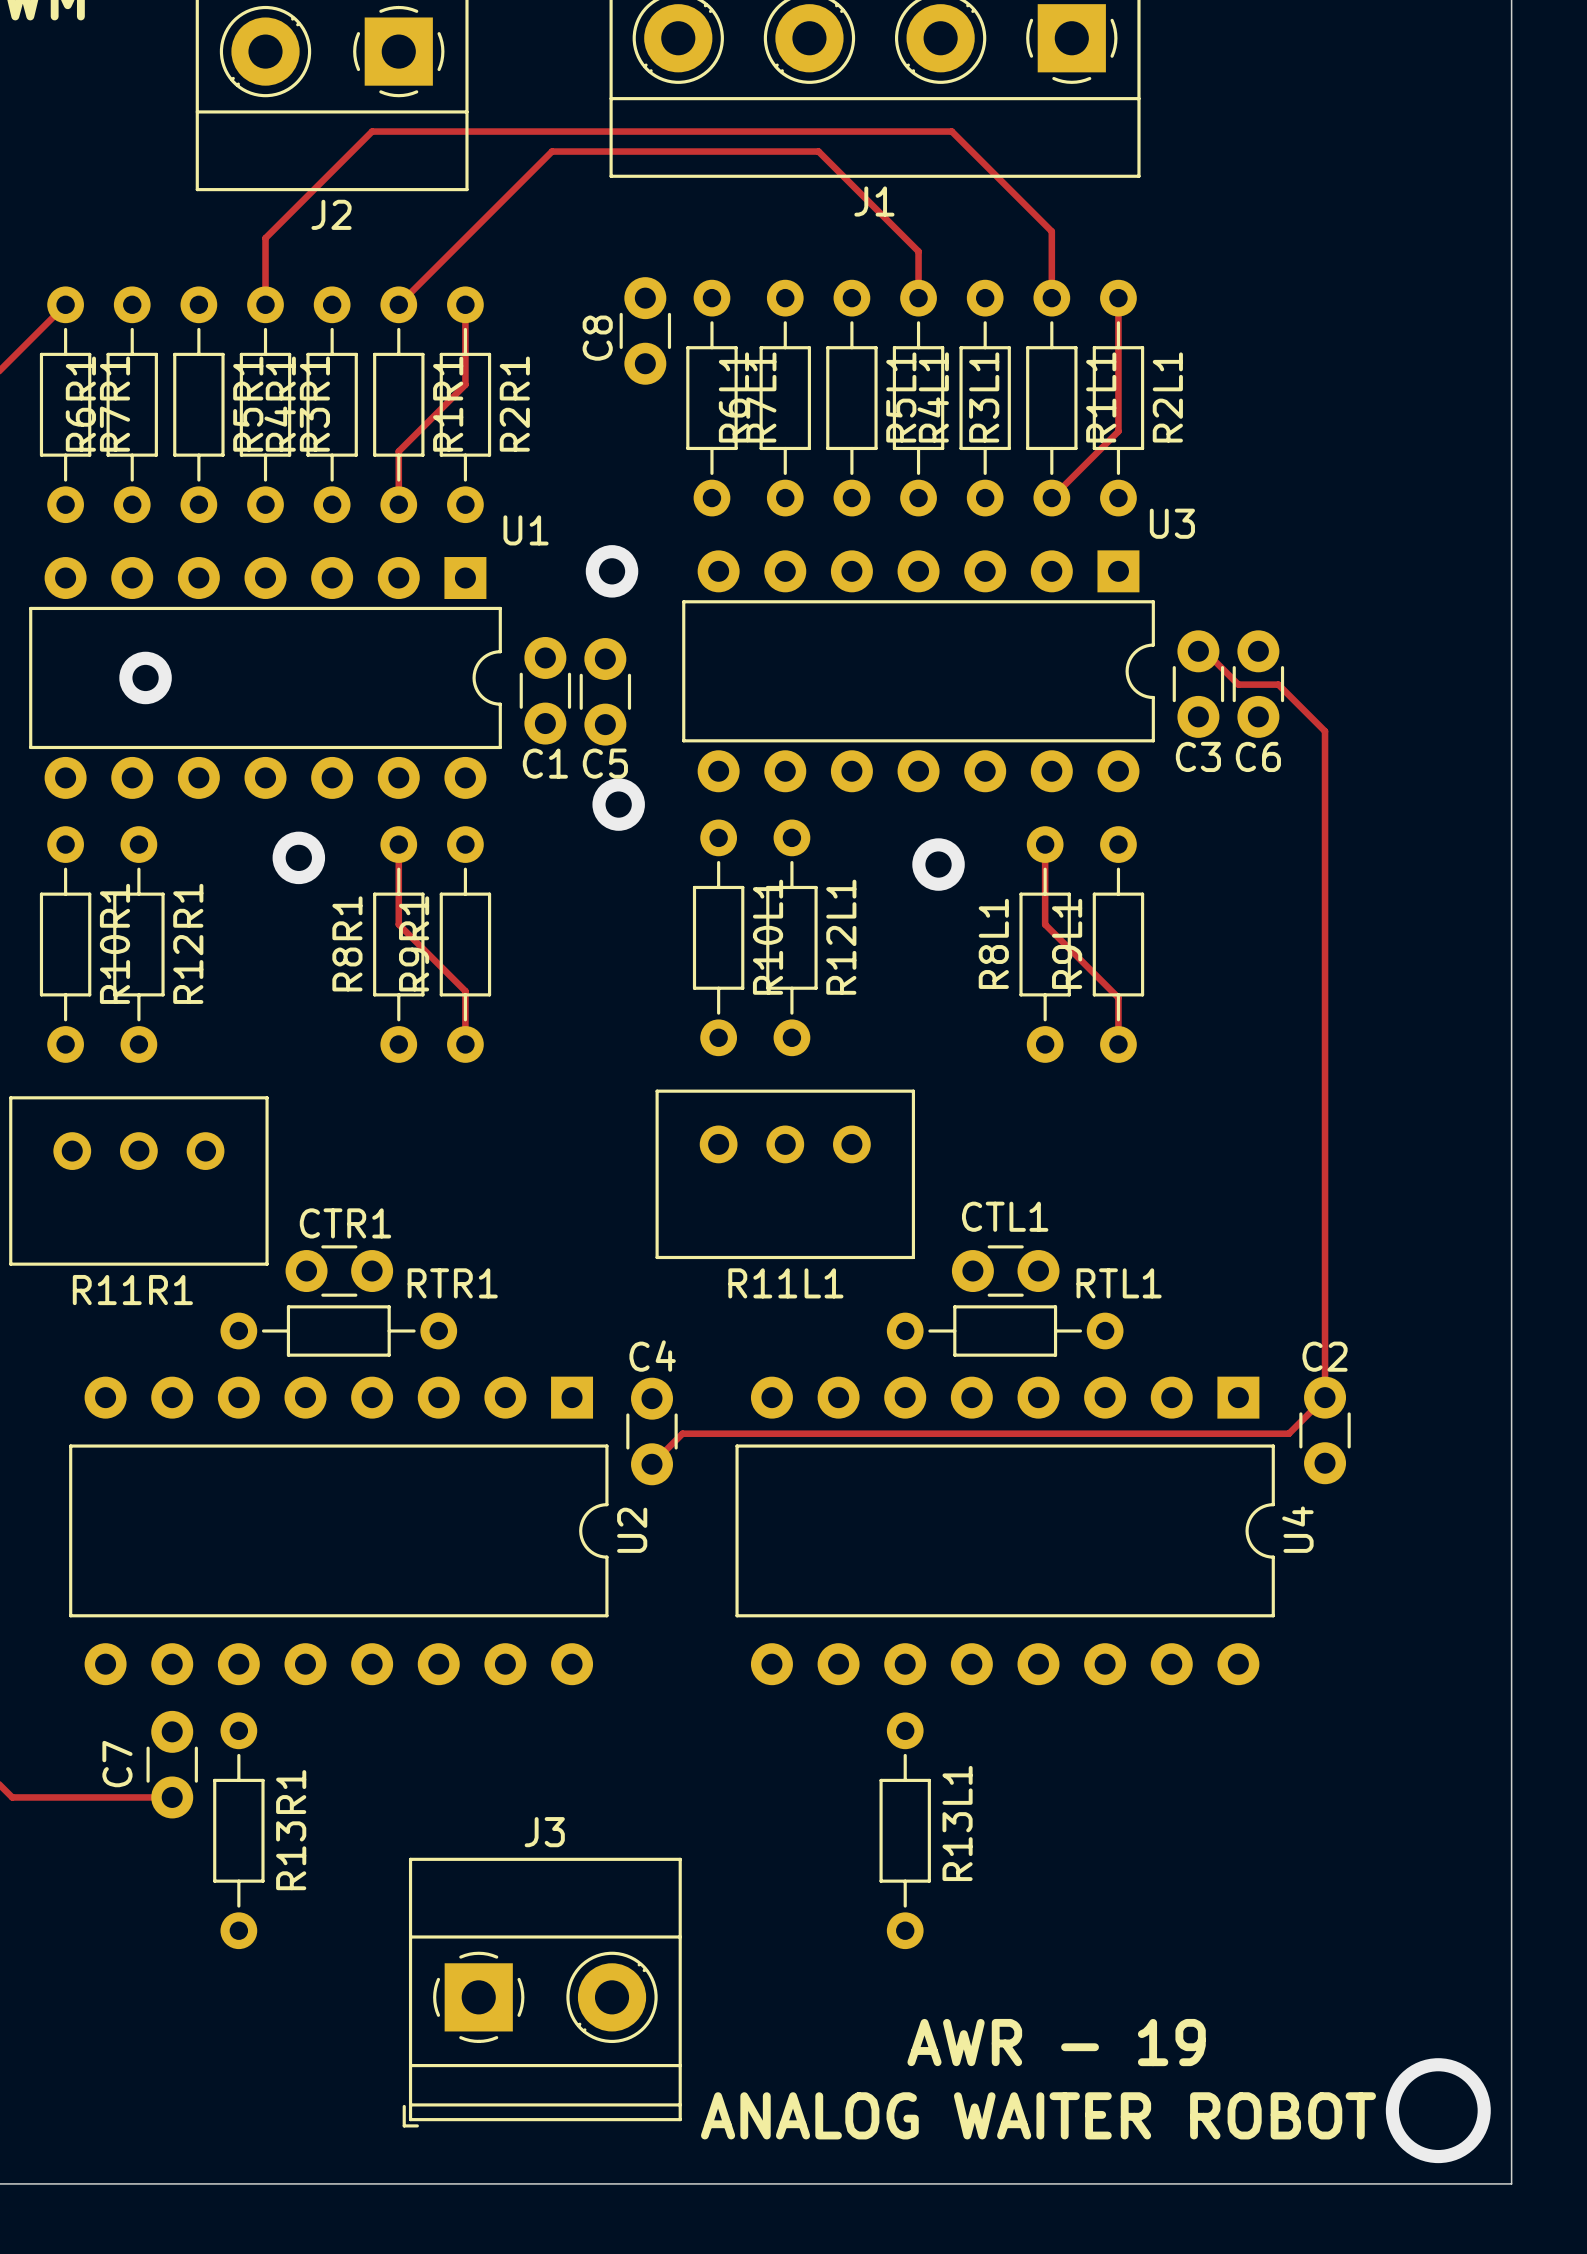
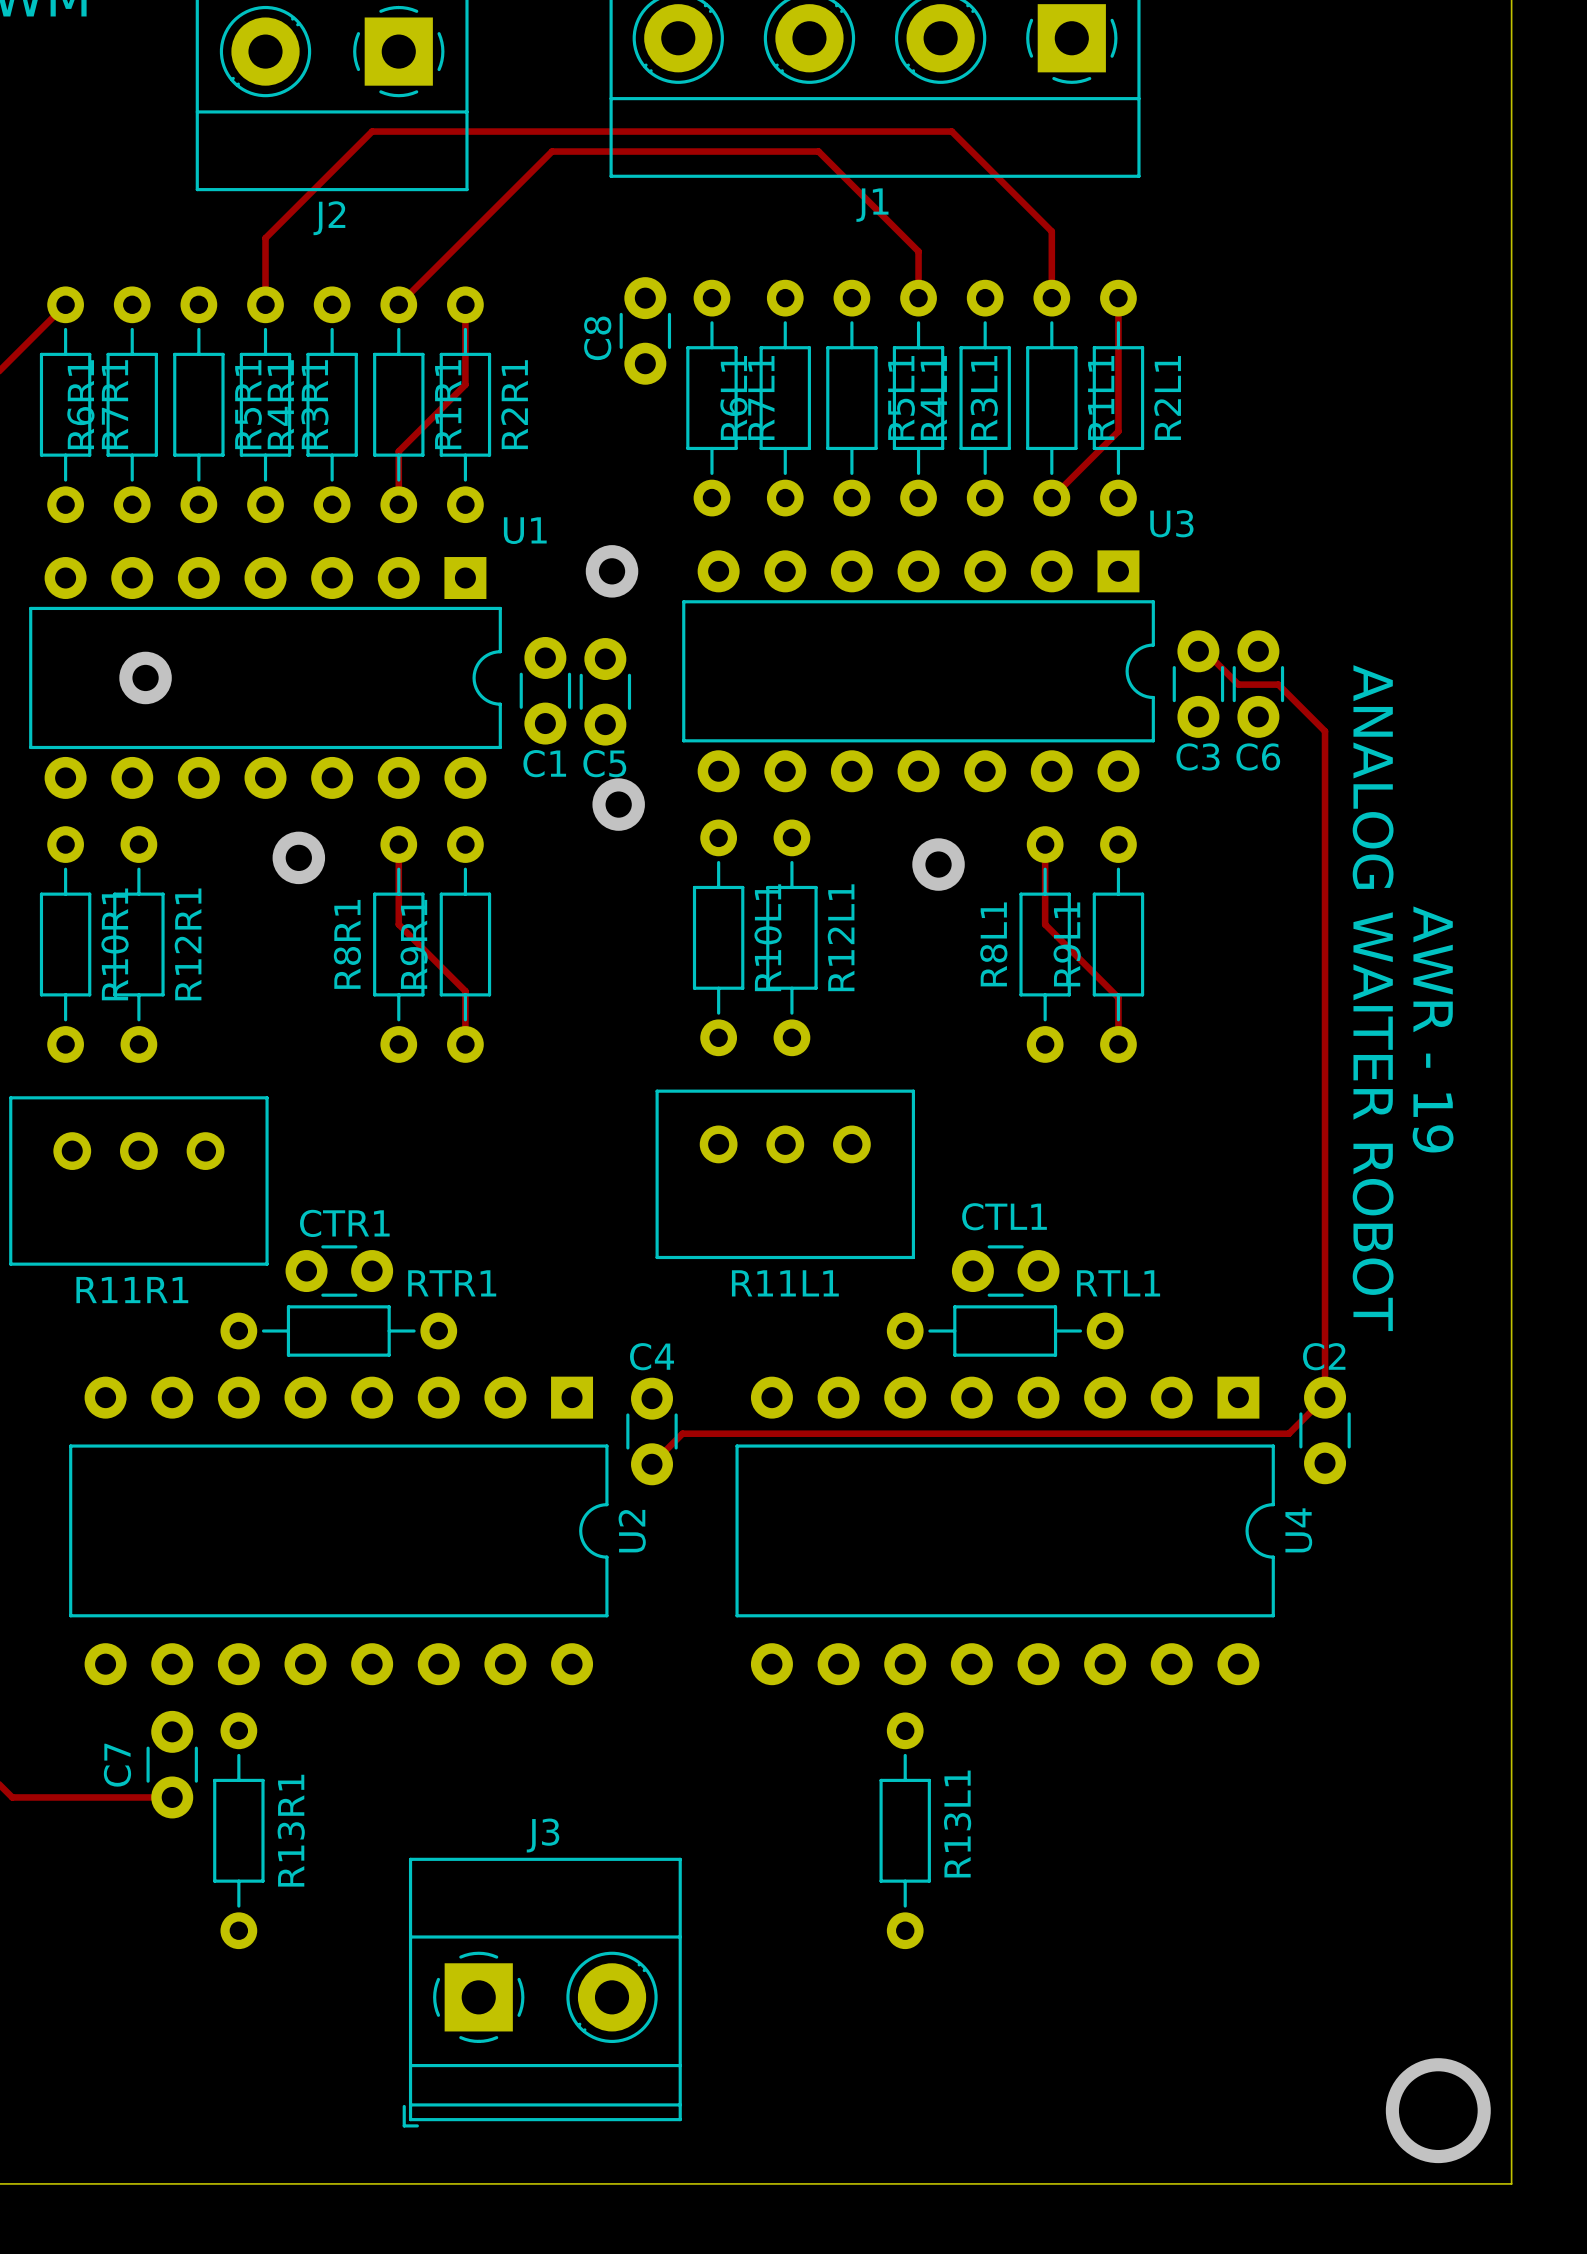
text: none -> ANALOG WAITER ROBOT (1373, 998)
text: none -> AWR - 19 (1433, 1029)
text: AWR - 19 (1056, 2042) -> none
text: ANALOG WAITER ROBOT (1038, 2115) -> none

